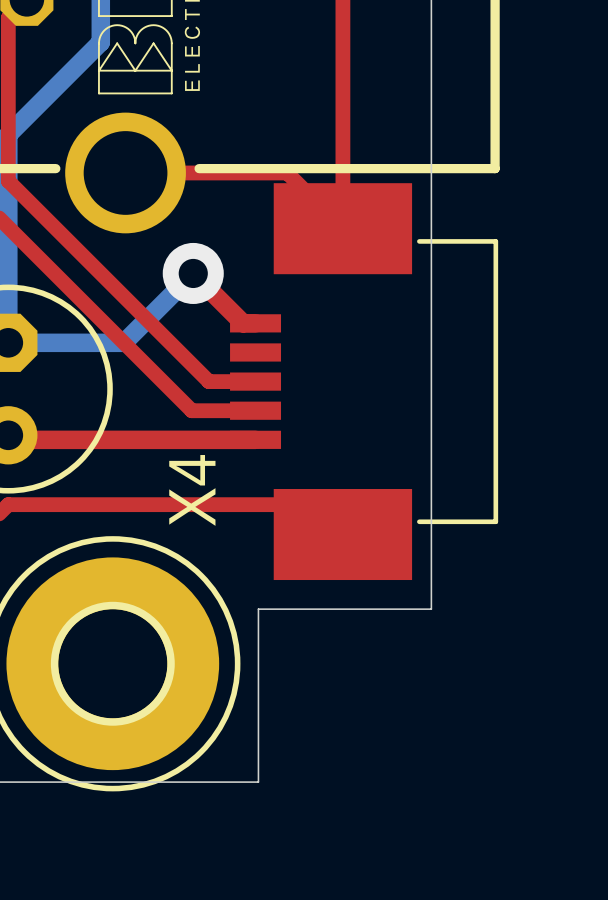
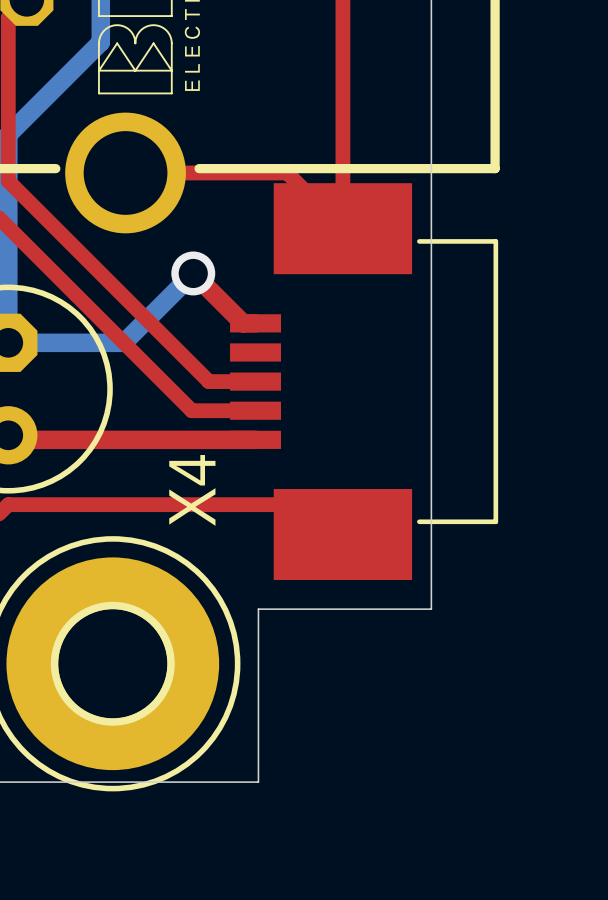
via size: [162, 242, 224, 304] -> [171, 251, 216, 296]

